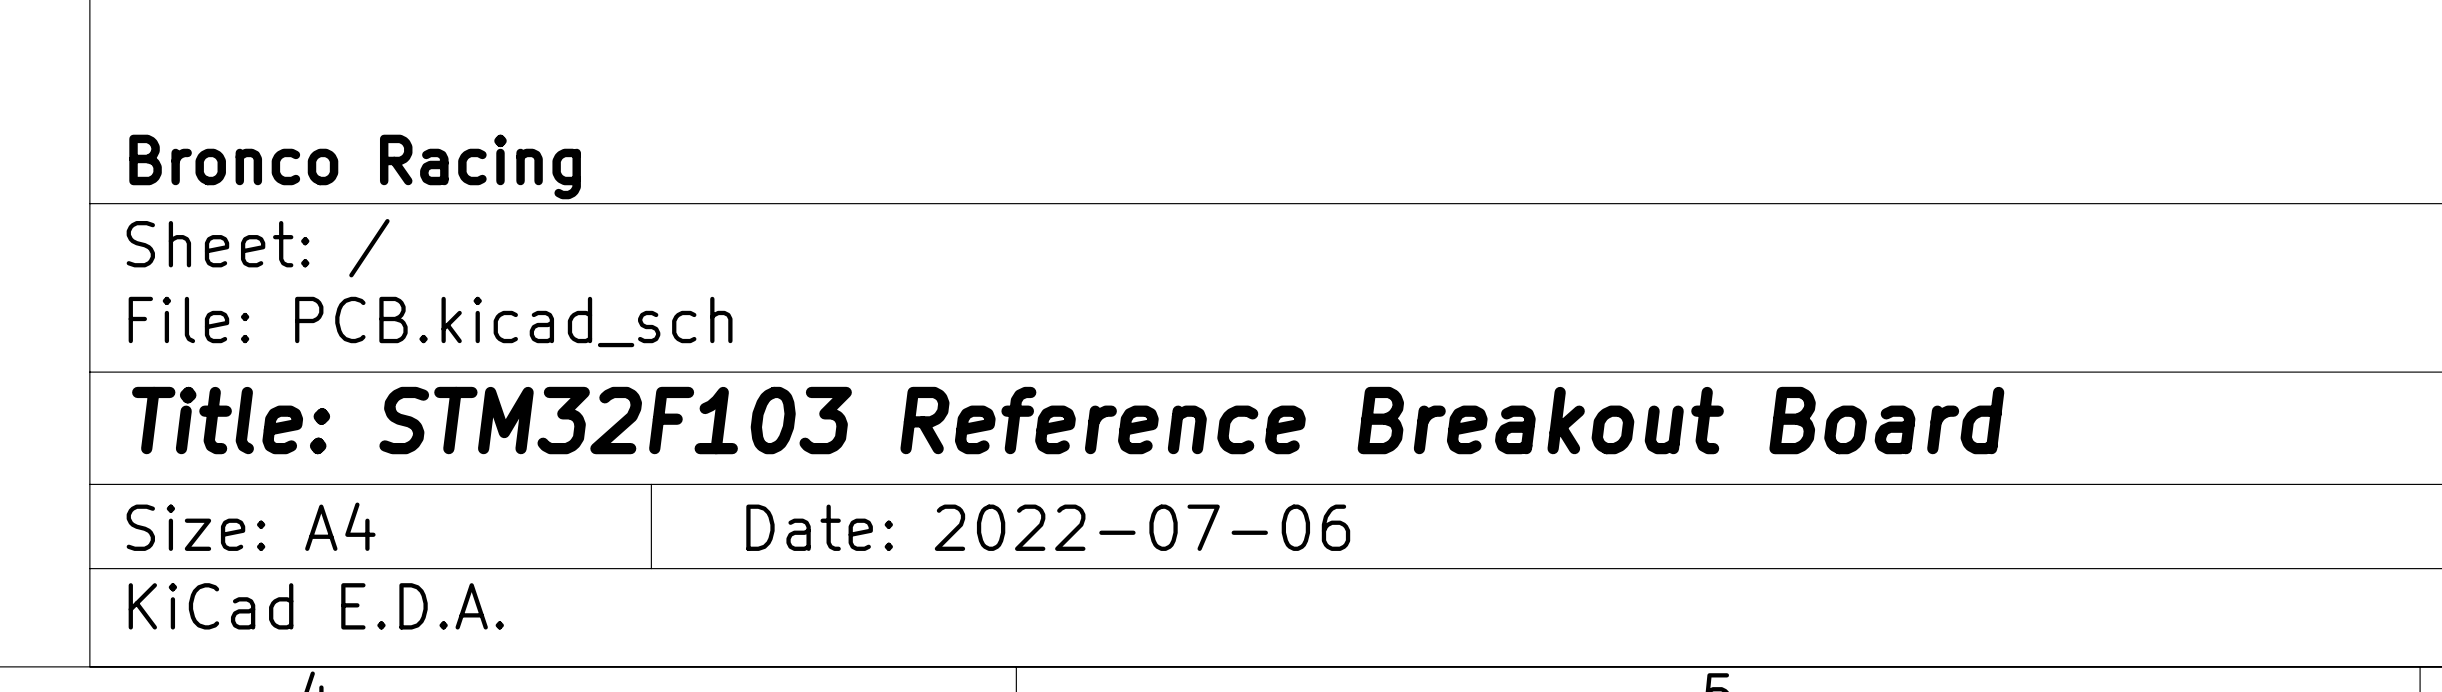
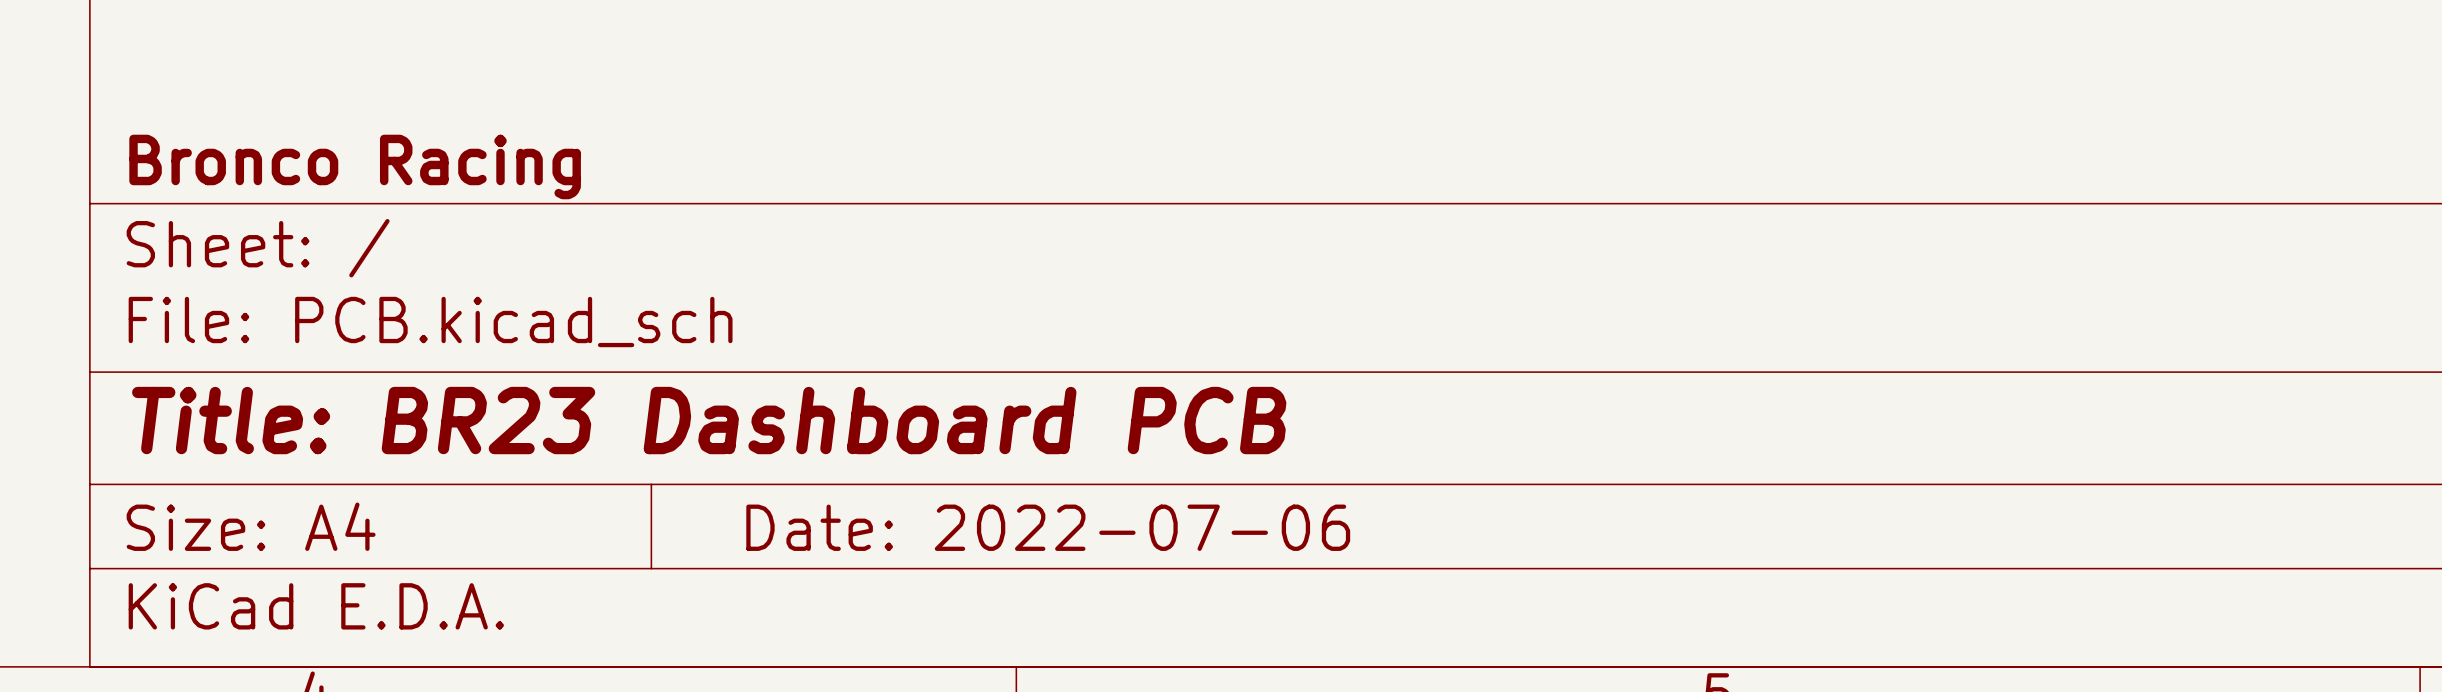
title block: Title: STM32F103 Reference Breakout Board (1068, 420) -> Title: BR23 Dashboard PCB (709, 420)

